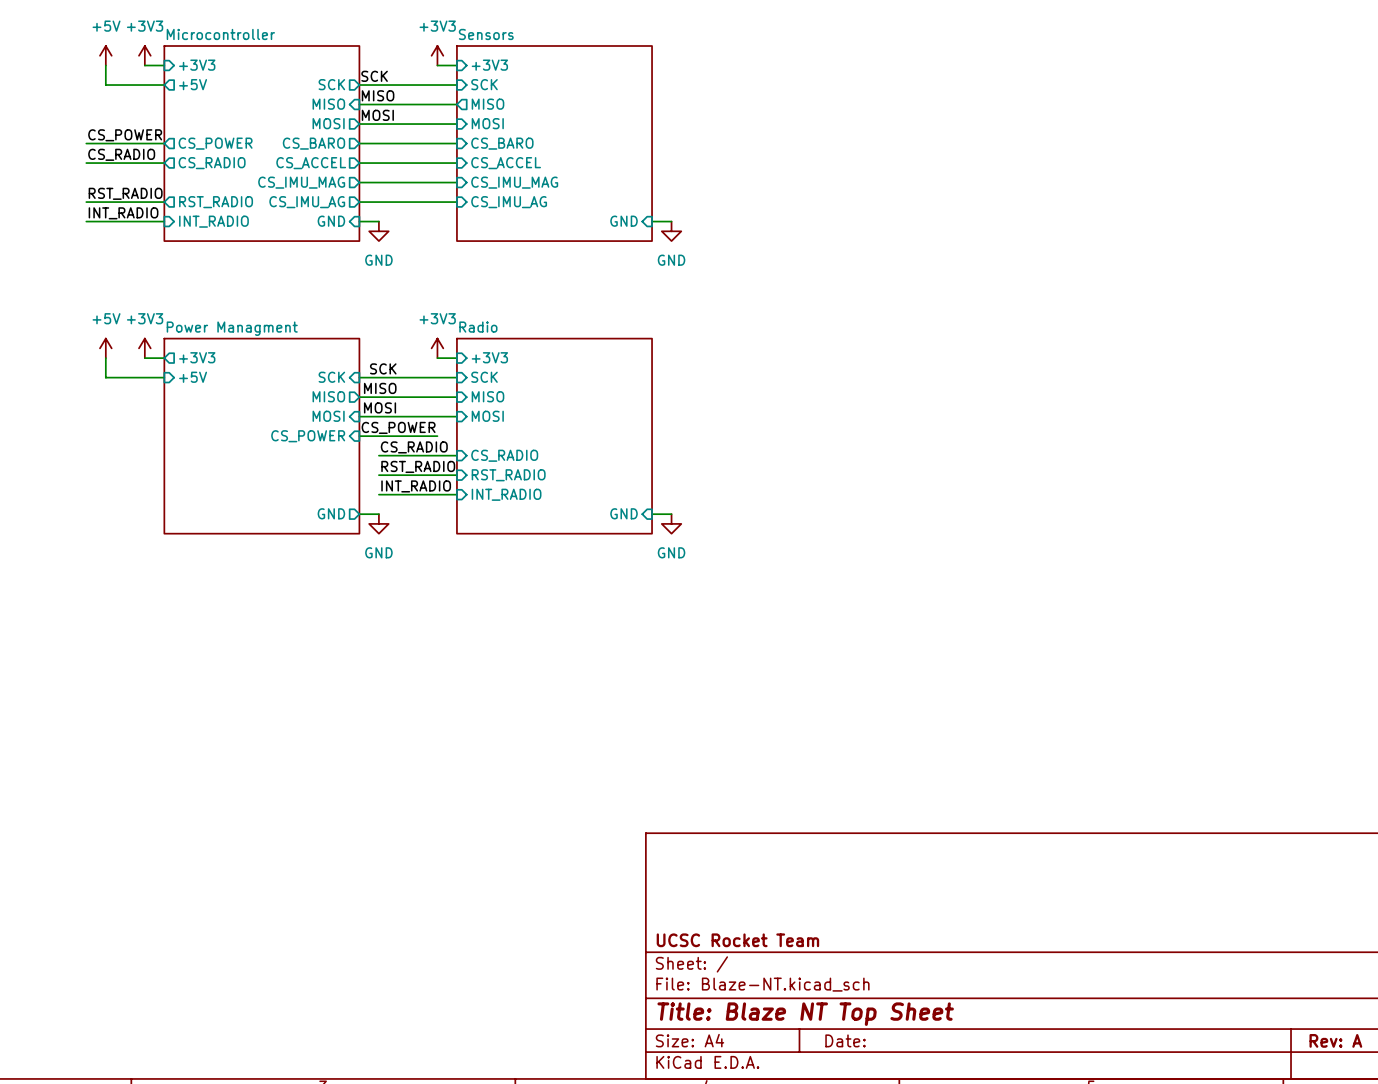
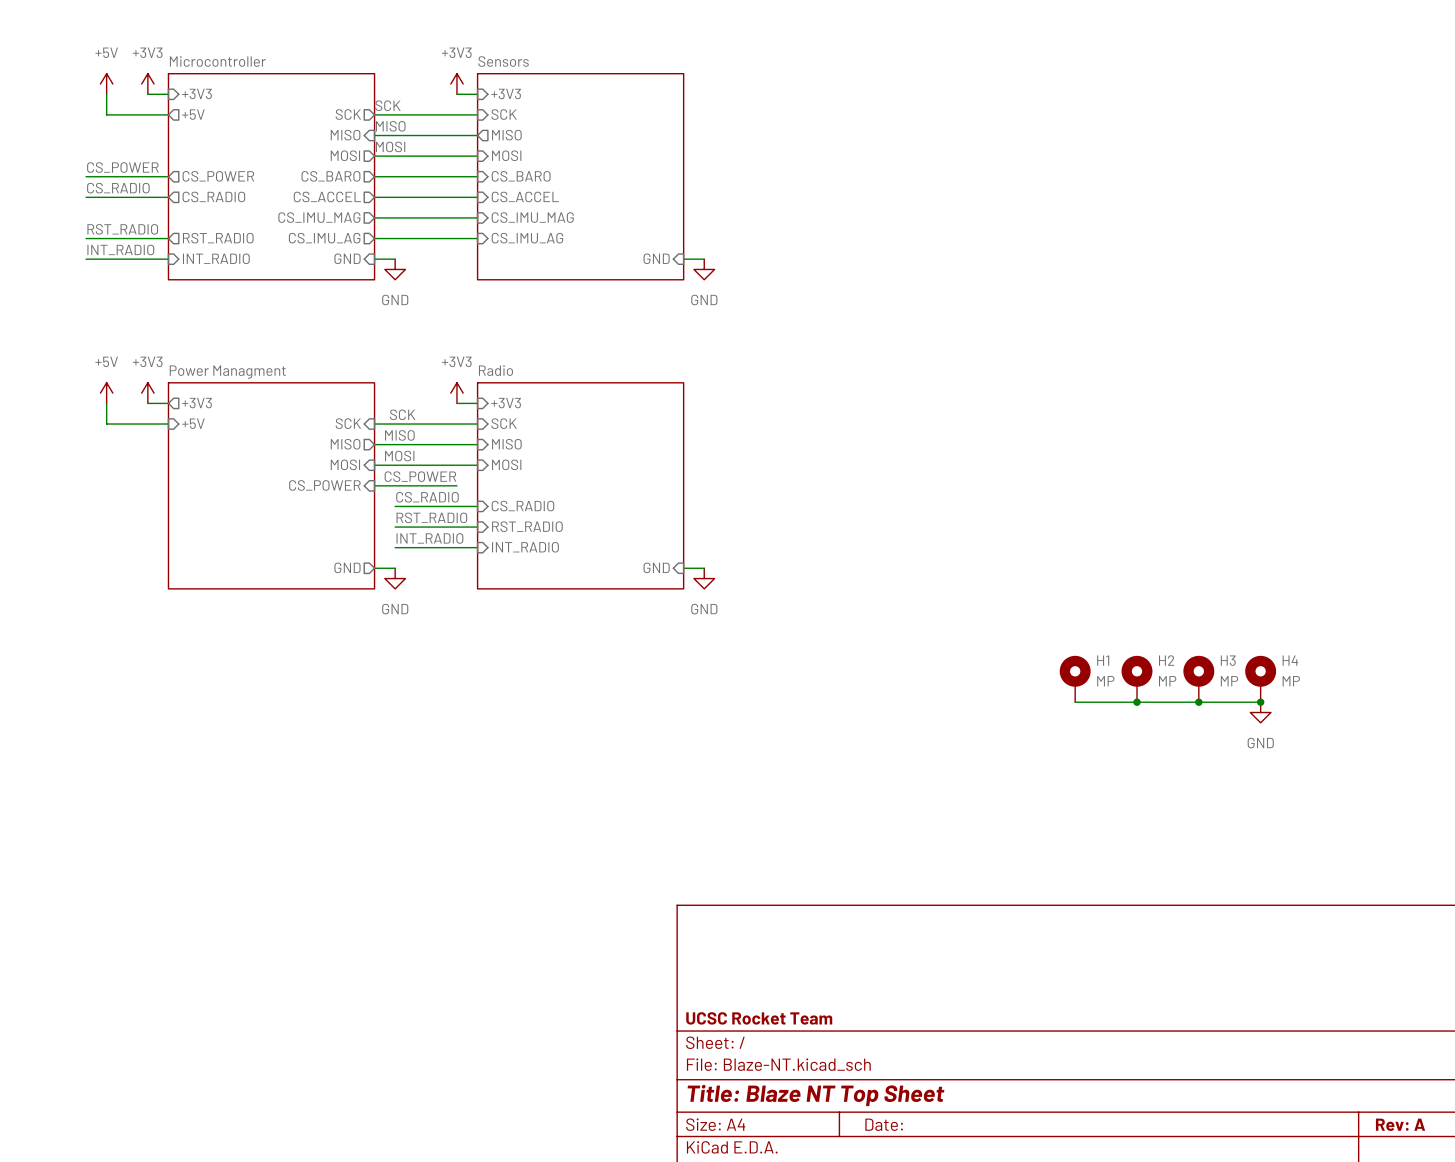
H1: none -> MP (1075, 679)
H2: none -> MP (1137, 679)
H3: none -> MP (1198, 679)
H4: none -> MP (1260, 679)
wire: none -> (1075, 702) (1260, 702)
junction: none -> (1137, 702)
junction: none -> (1198, 702)
junction: none -> (1260, 702)
power symbol: none -> GND (1260, 712)

